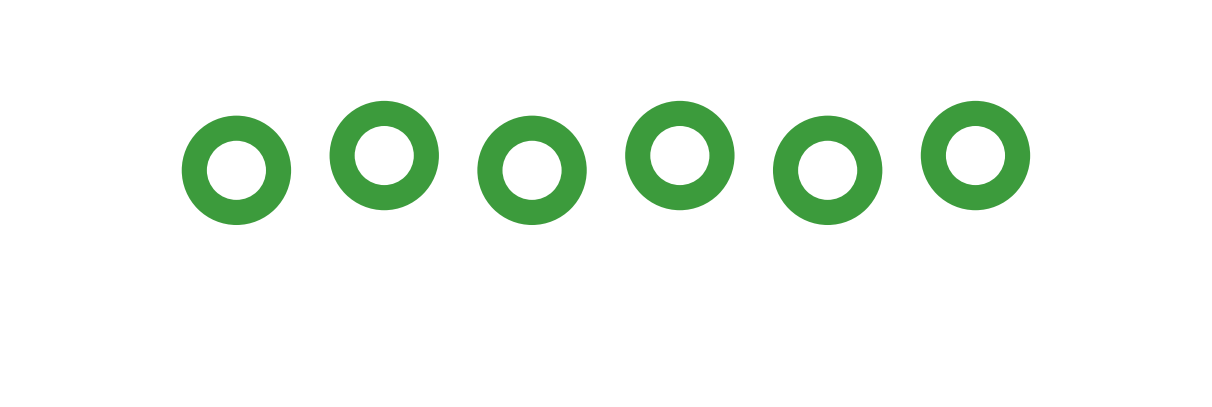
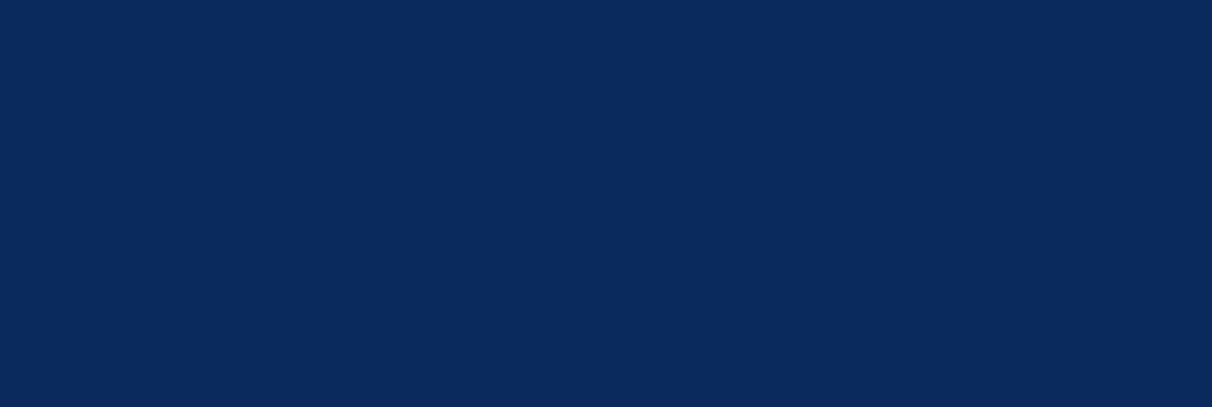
part: (605, 162) -> none

